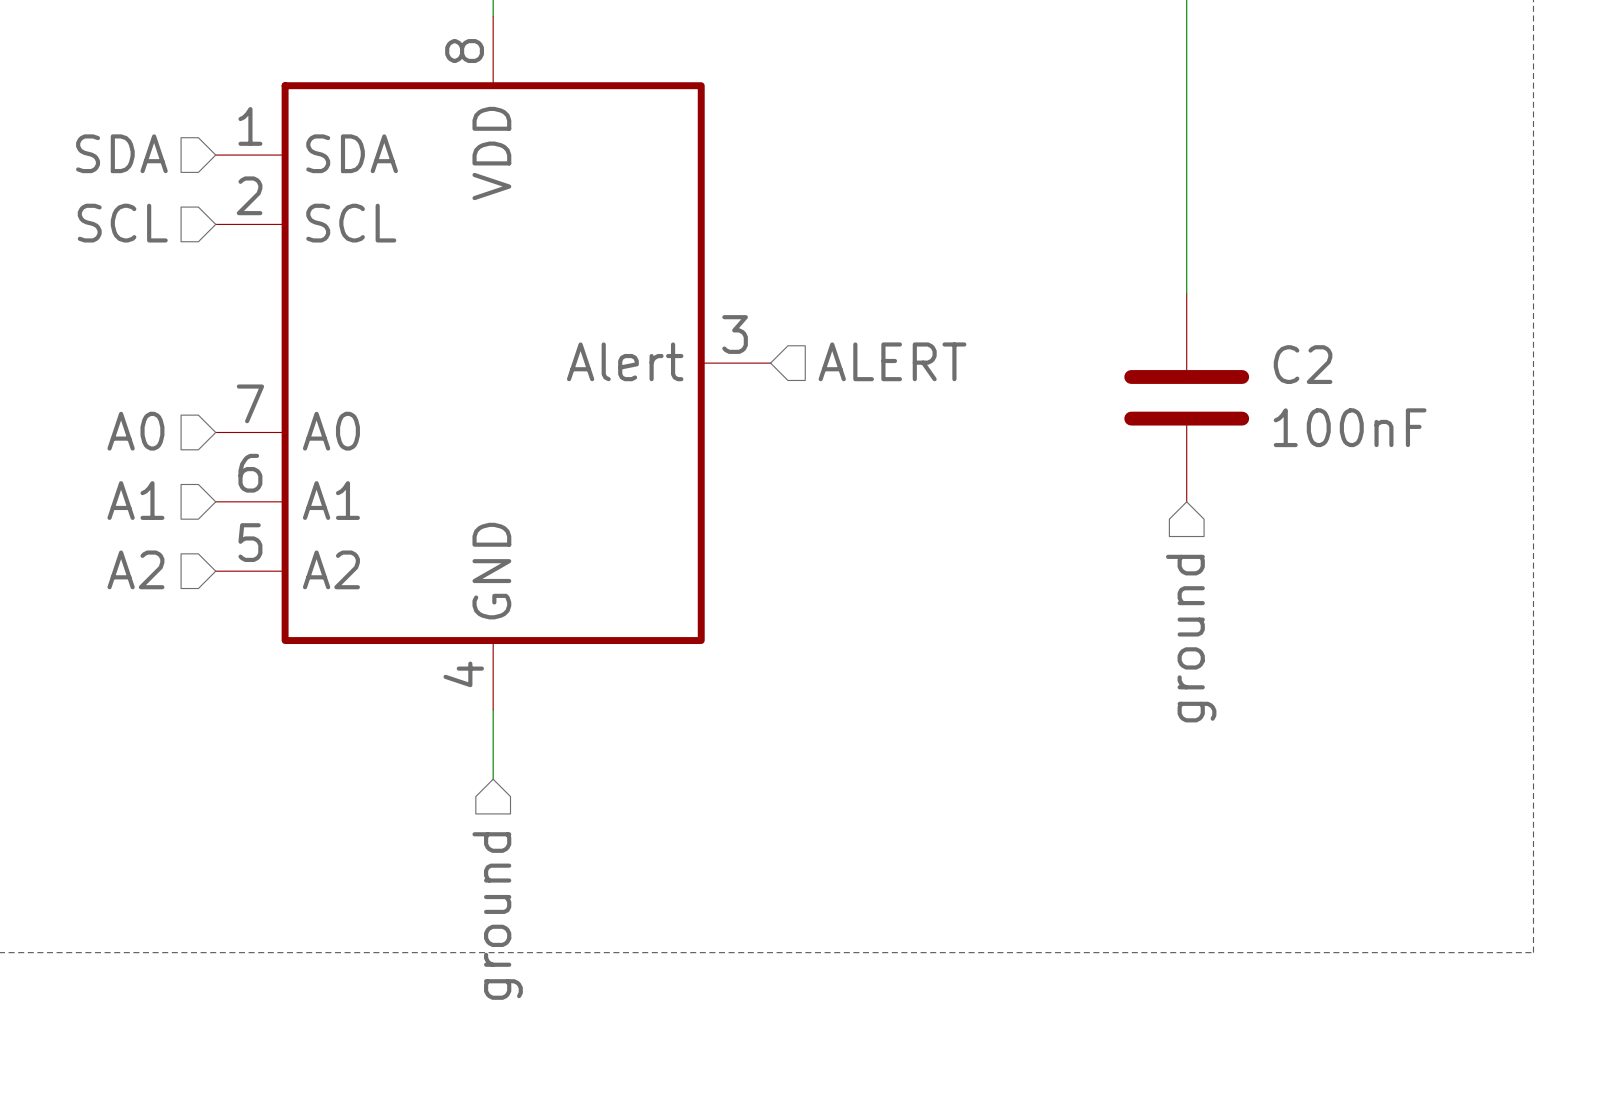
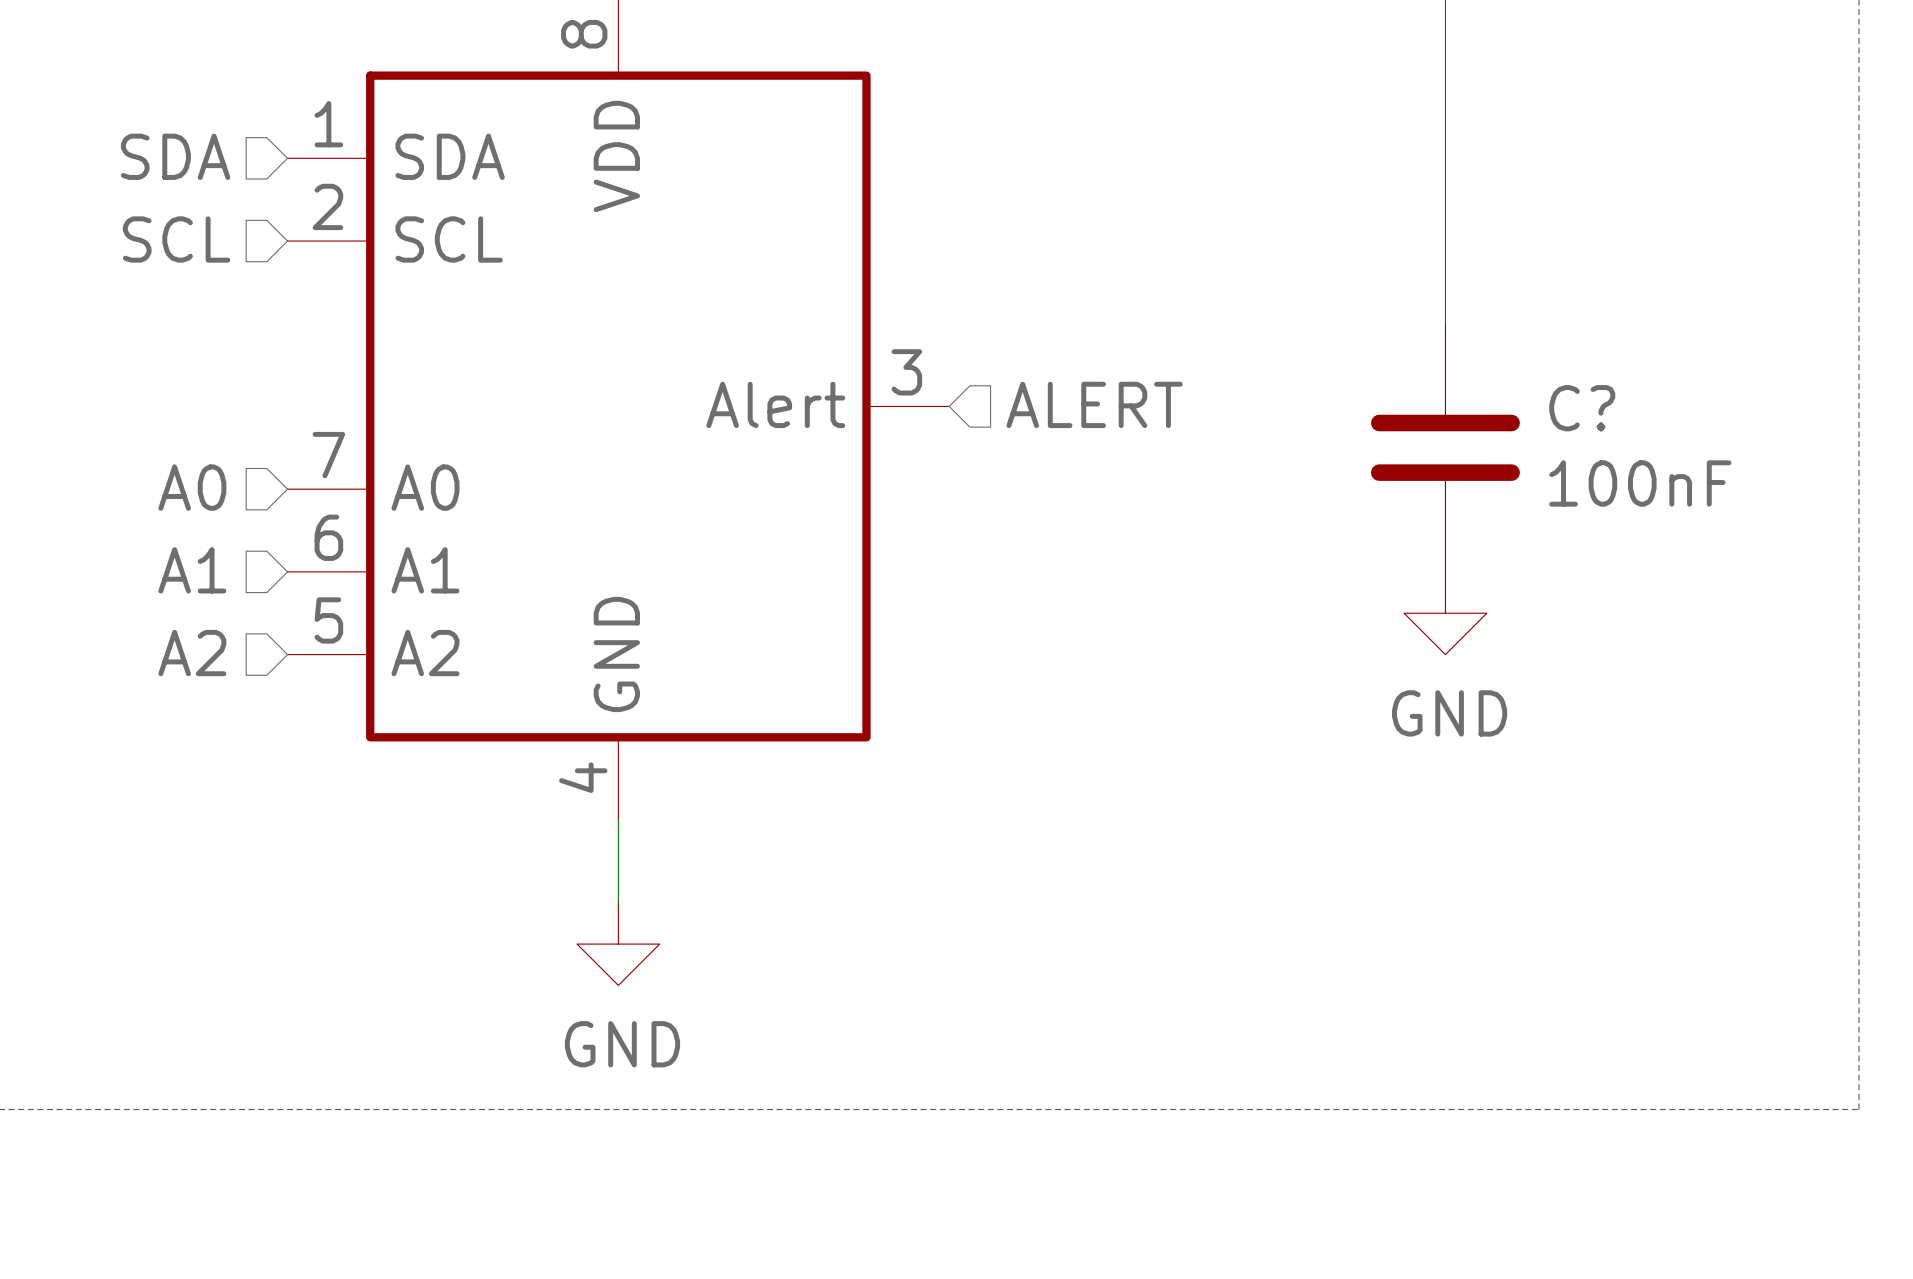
C2 name: C2 (1303, 364) -> C? (1582, 408)
power symbol: none -> GND (1445, 613)
hierarchical label: ground (1191, 638) -> none
power symbol: none -> GND (618, 944)
hierarchical label: ground (497, 916) -> none

